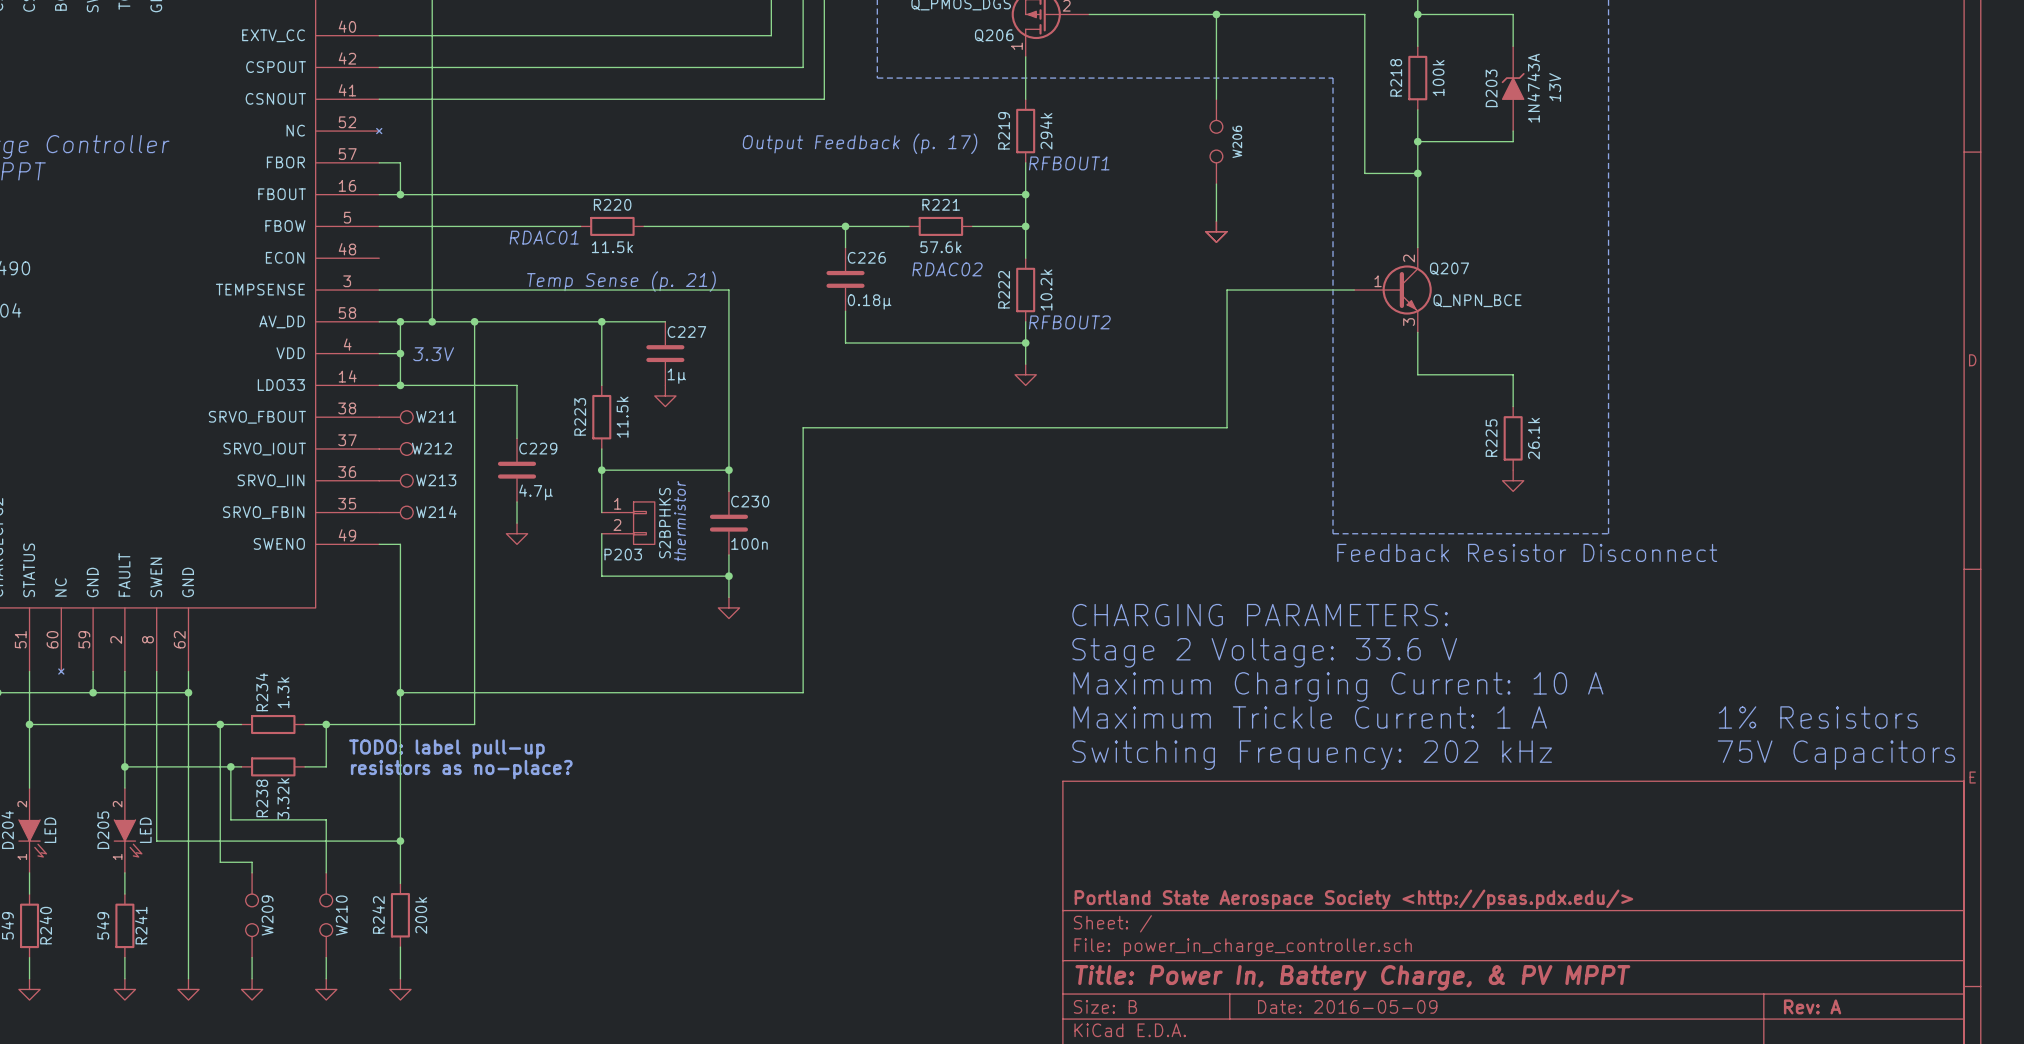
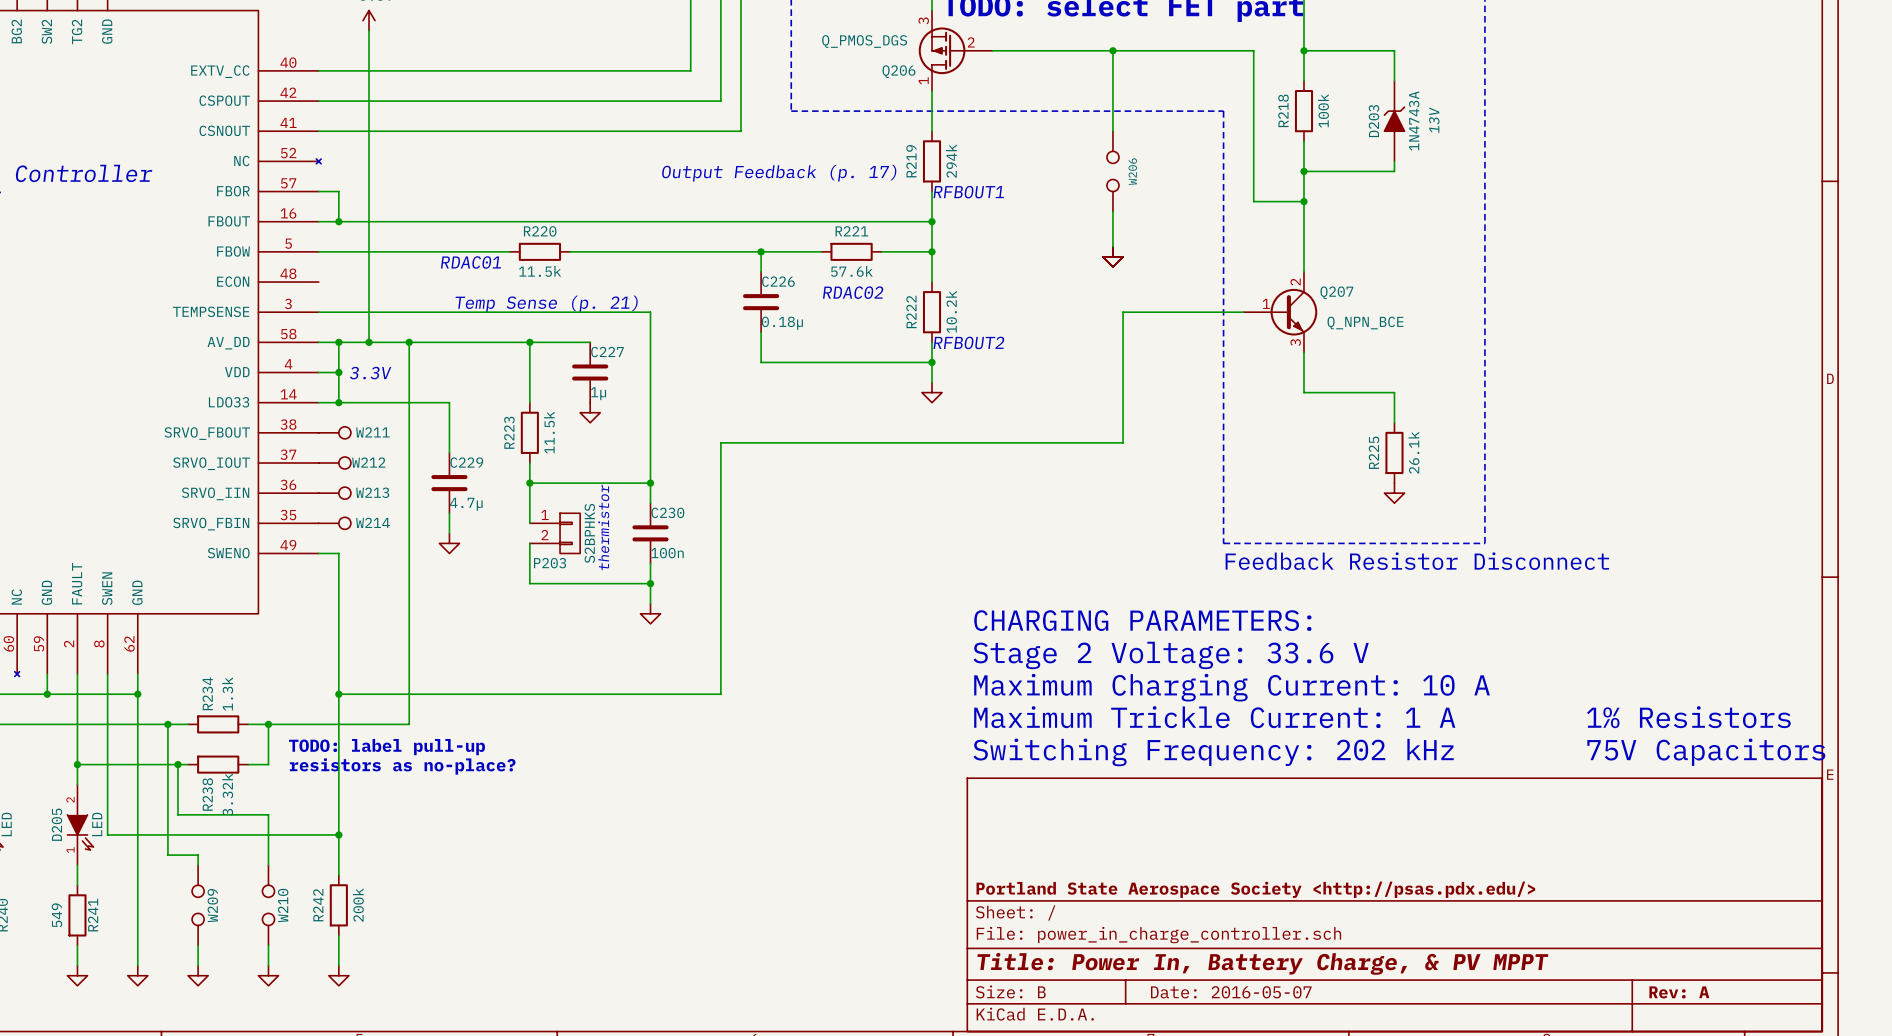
title block: Date: 2016-05-09 (1347, 1006) -> Date: 2016-05-07 (1231, 992)

